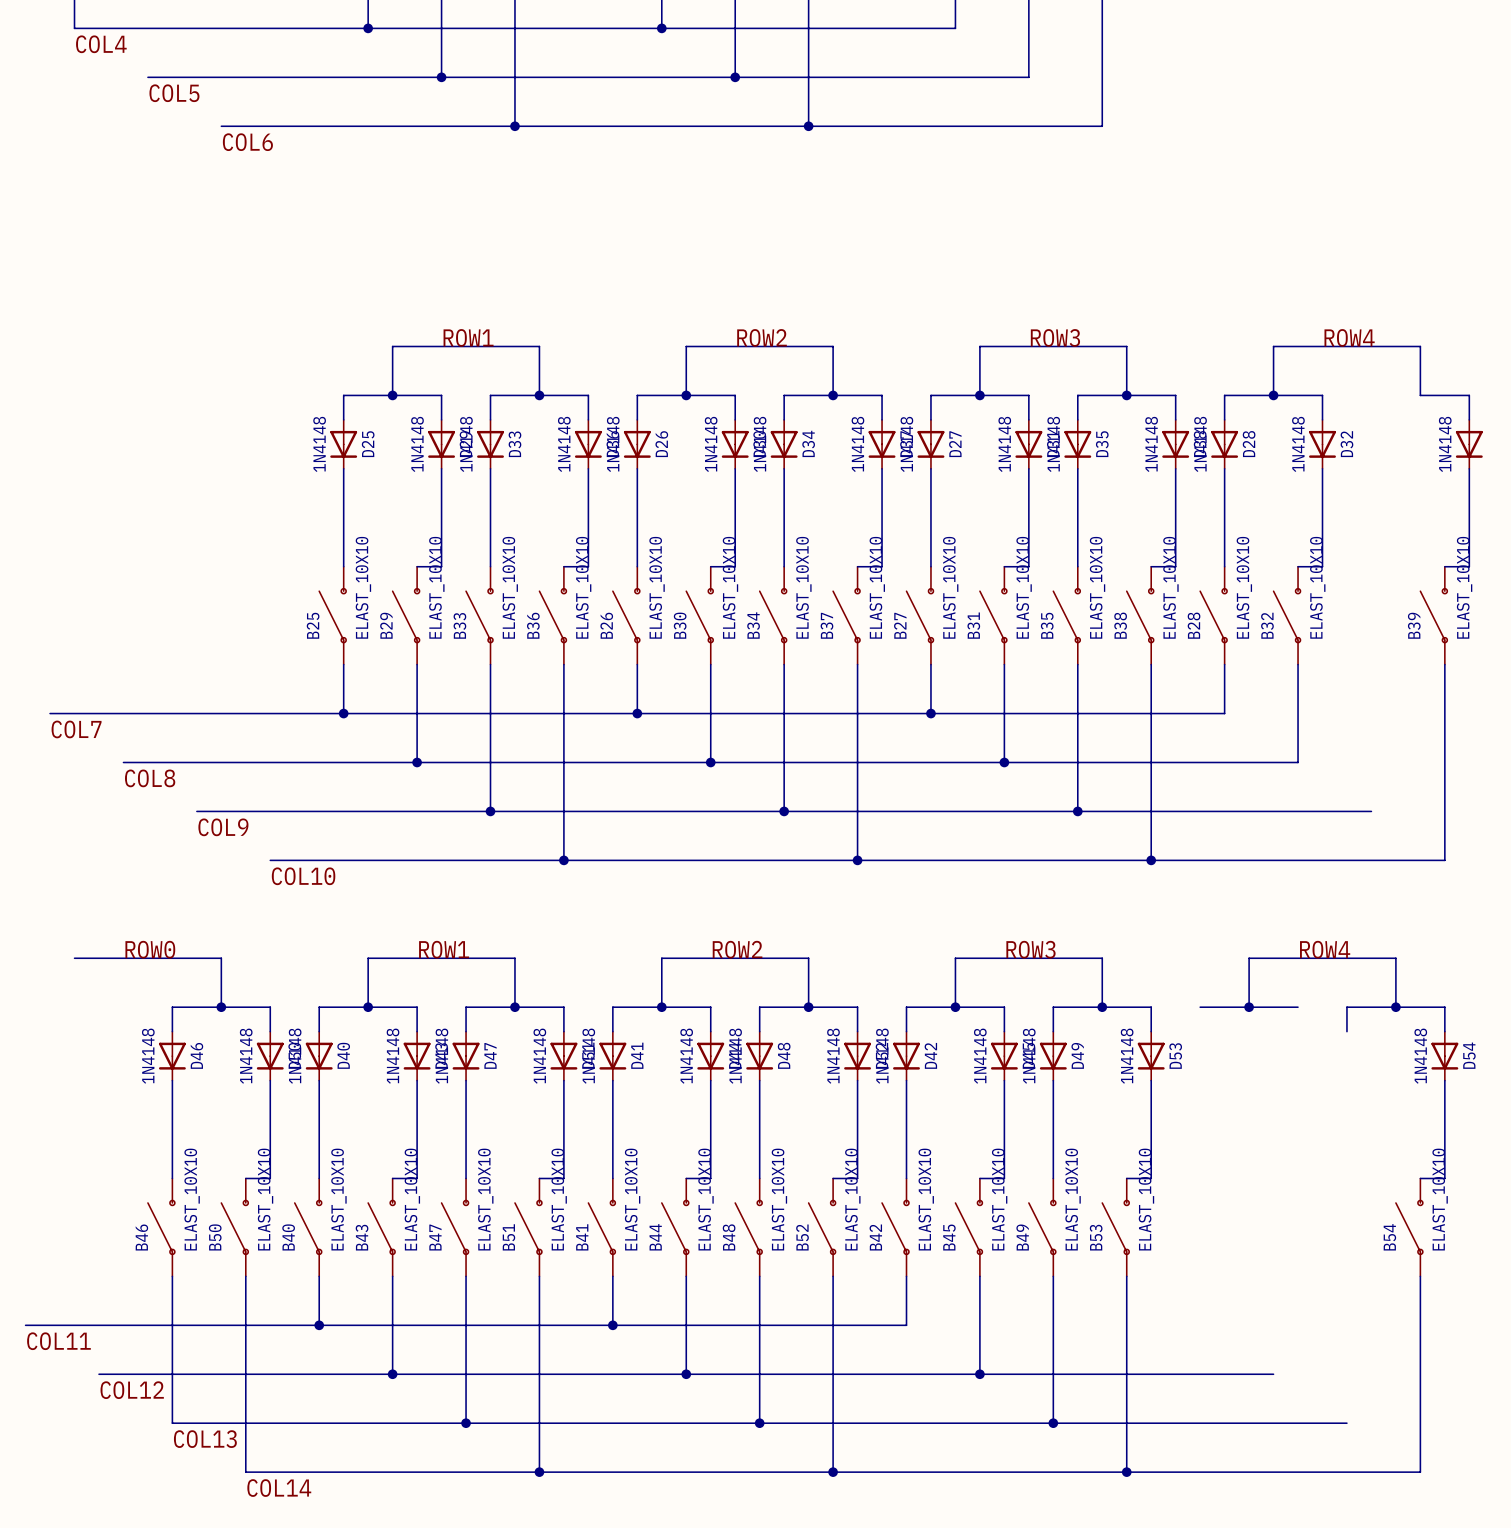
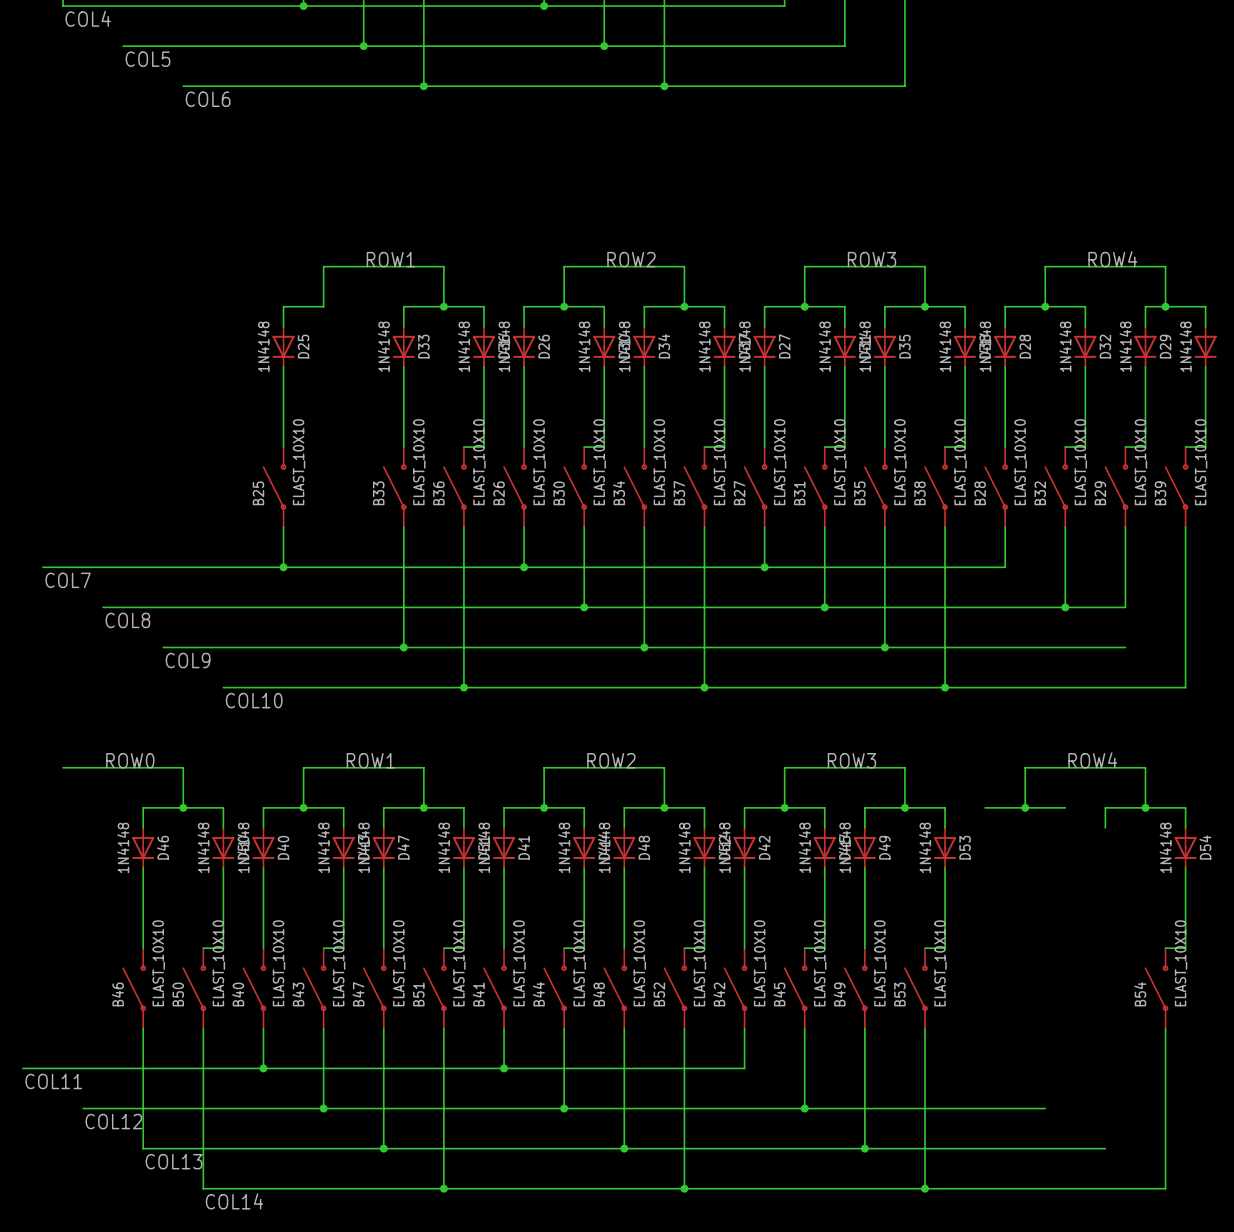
wire: (392, 395) (441, 395) (441, 419) -> none
junction: (392, 395) -> none
wire: none -> (1165, 306) (1145, 306) (1145, 326)
junction: none -> (1165, 306)
D29 position: (441, 444) -> (1145, 346)
wire: (441, 468) (441, 566) (417, 566) -> none
wire: none -> (1145, 366) (1145, 447) (1125, 447)
B29 position: (406, 615) -> (1116, 487)
wire: (417, 664) (417, 762) -> none
wire: none -> (1125, 527) (1125, 607) (1065, 607)
junction: (417, 762) -> none
junction: none -> (1065, 607)

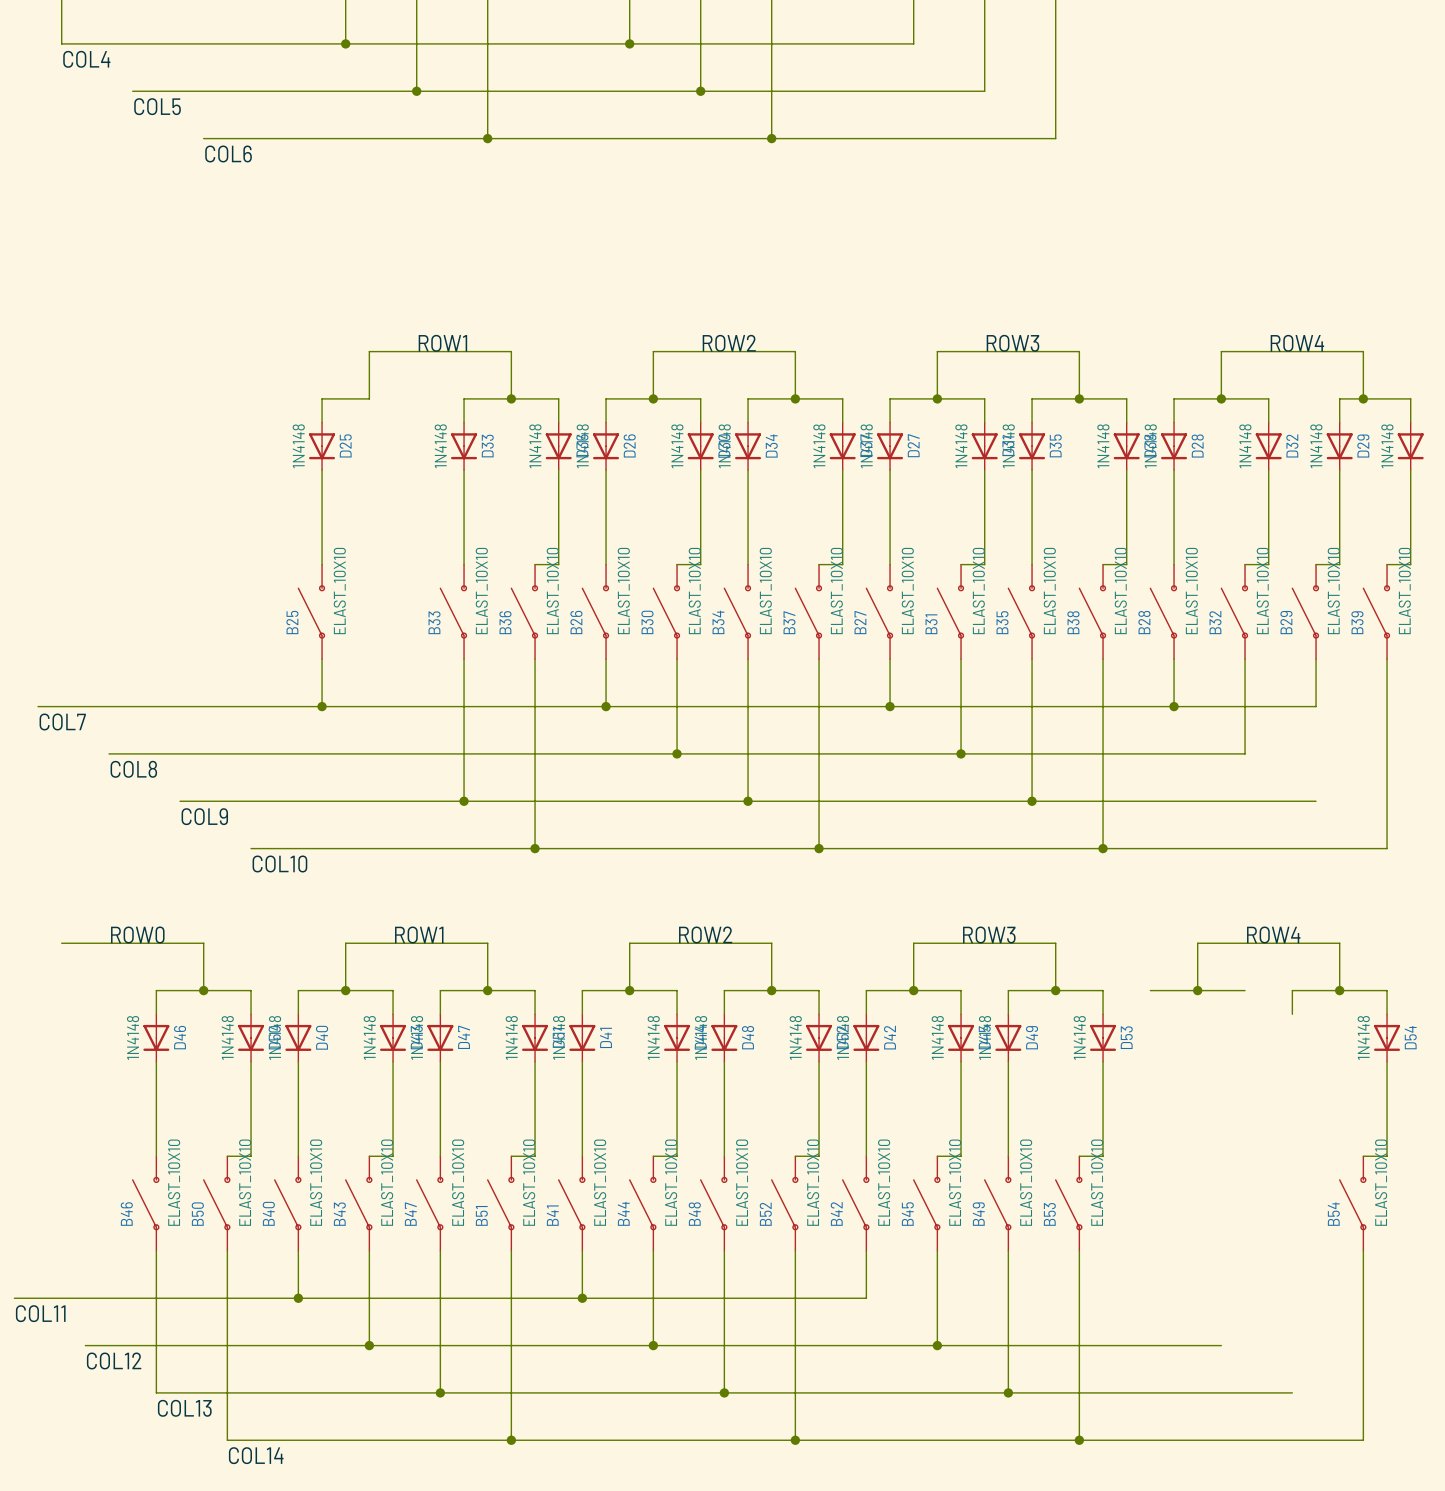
junction: none -> (1174, 706)
wire: (1125, 567) (1125, 607) (1065, 607) -> (1316, 706) (1174, 706)
junction: (1065, 607) -> none

